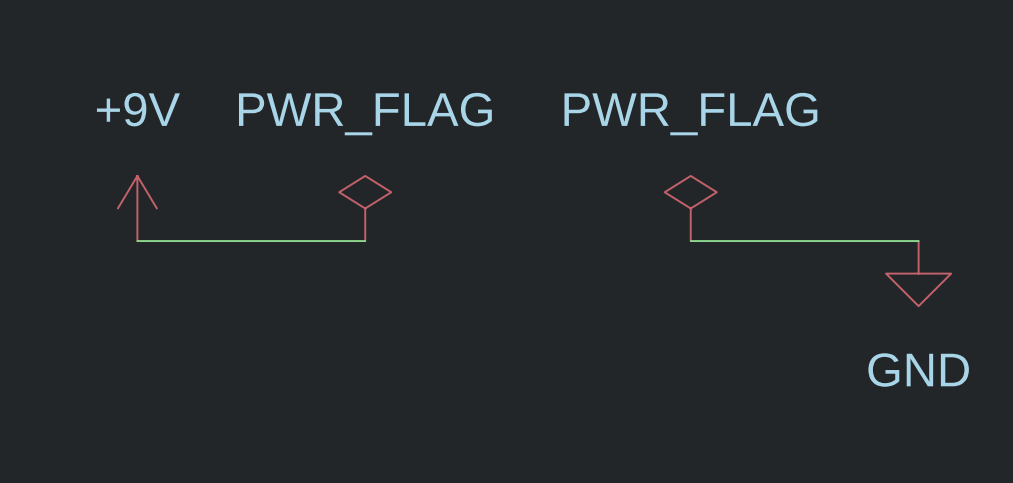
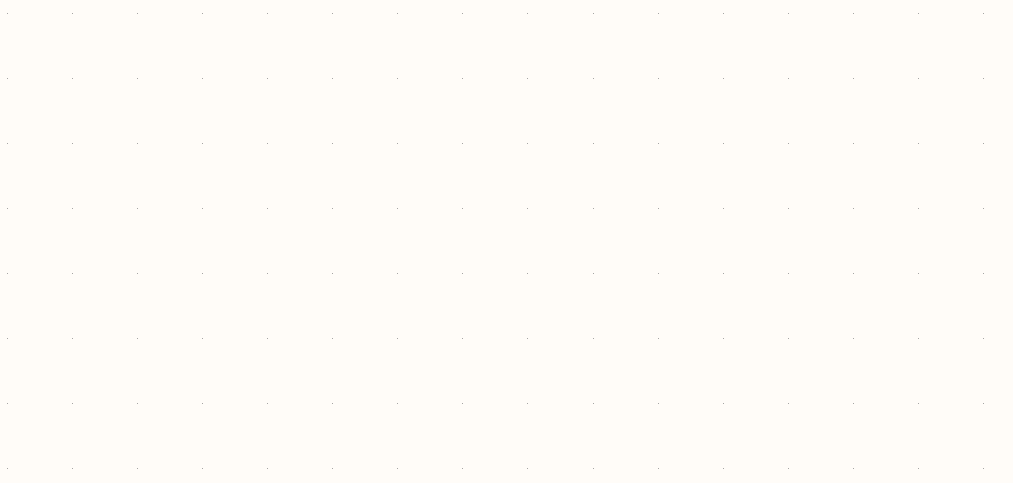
power symbol: +9V (137, 208) -> none
power symbol: PWR_FLAG (365, 208) -> none
power symbol: PWR_FLAG (690, 208) -> none
wire: (137, 241) (365, 241) -> none
wire: (690, 241) (918, 241) -> none
power symbol: GND (918, 273) -> none

